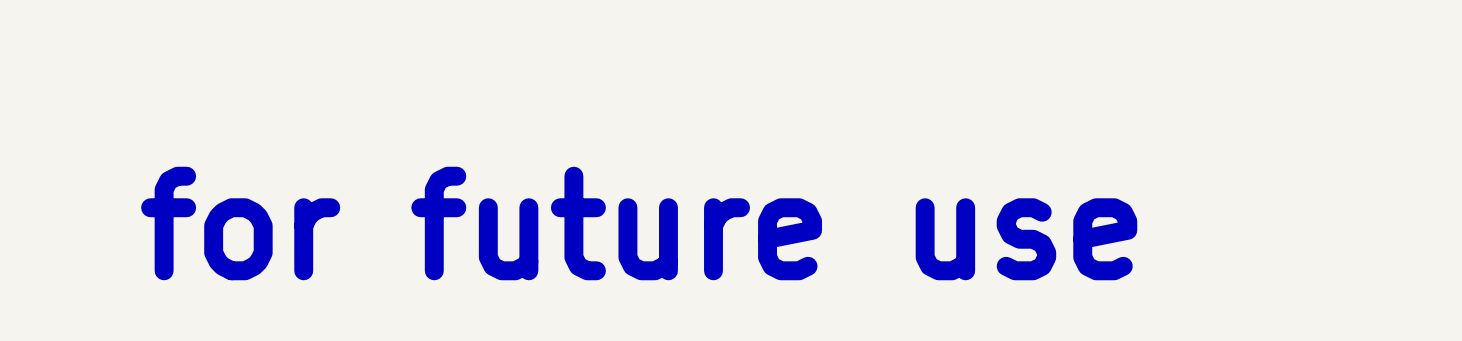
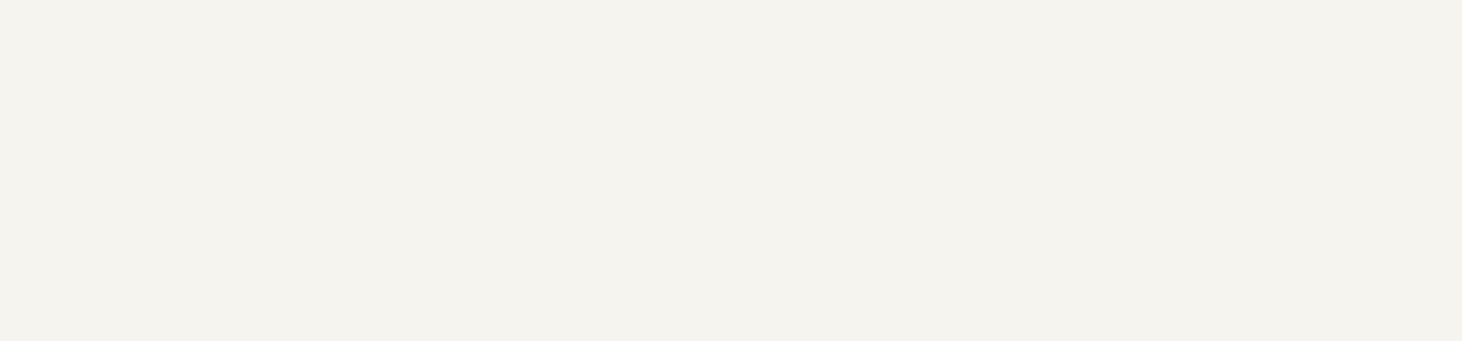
text: for future use (639, 223) -> none

